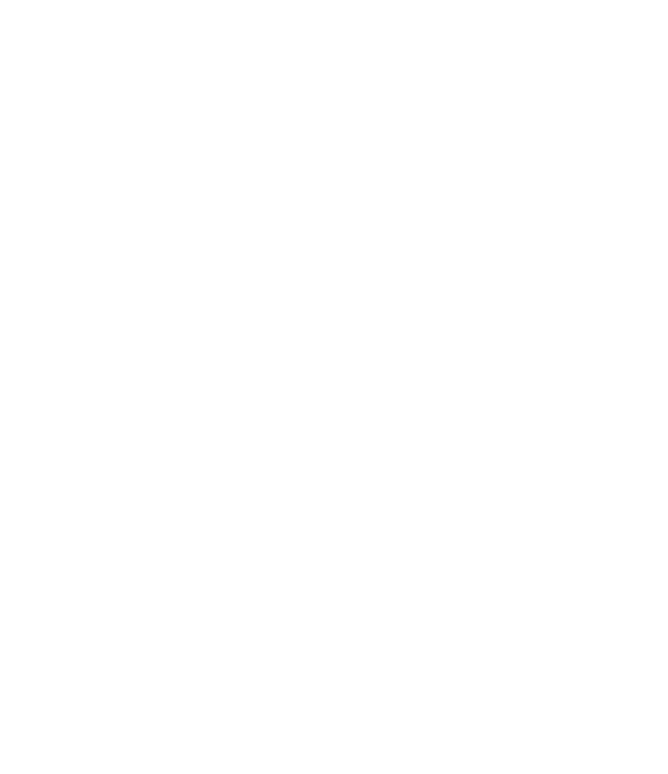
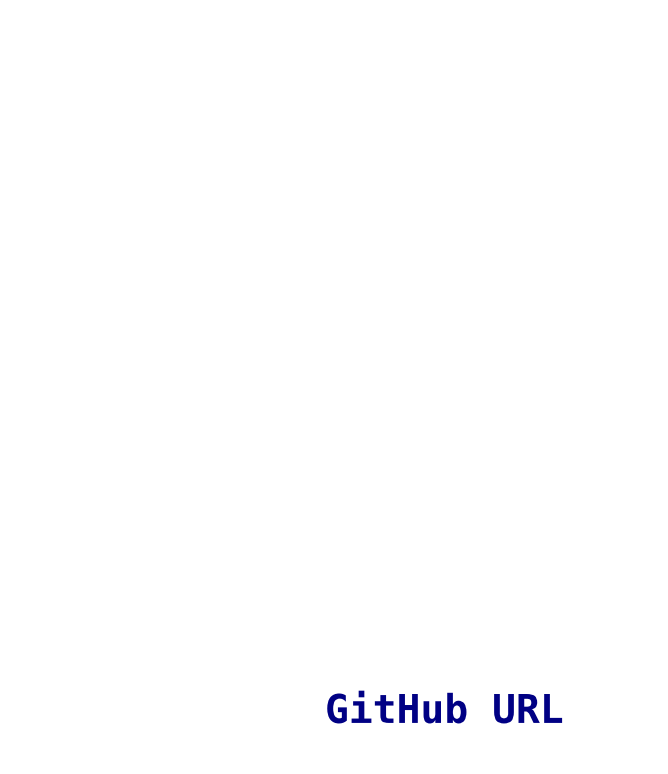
text: none -> GitHub URL (444, 707)

